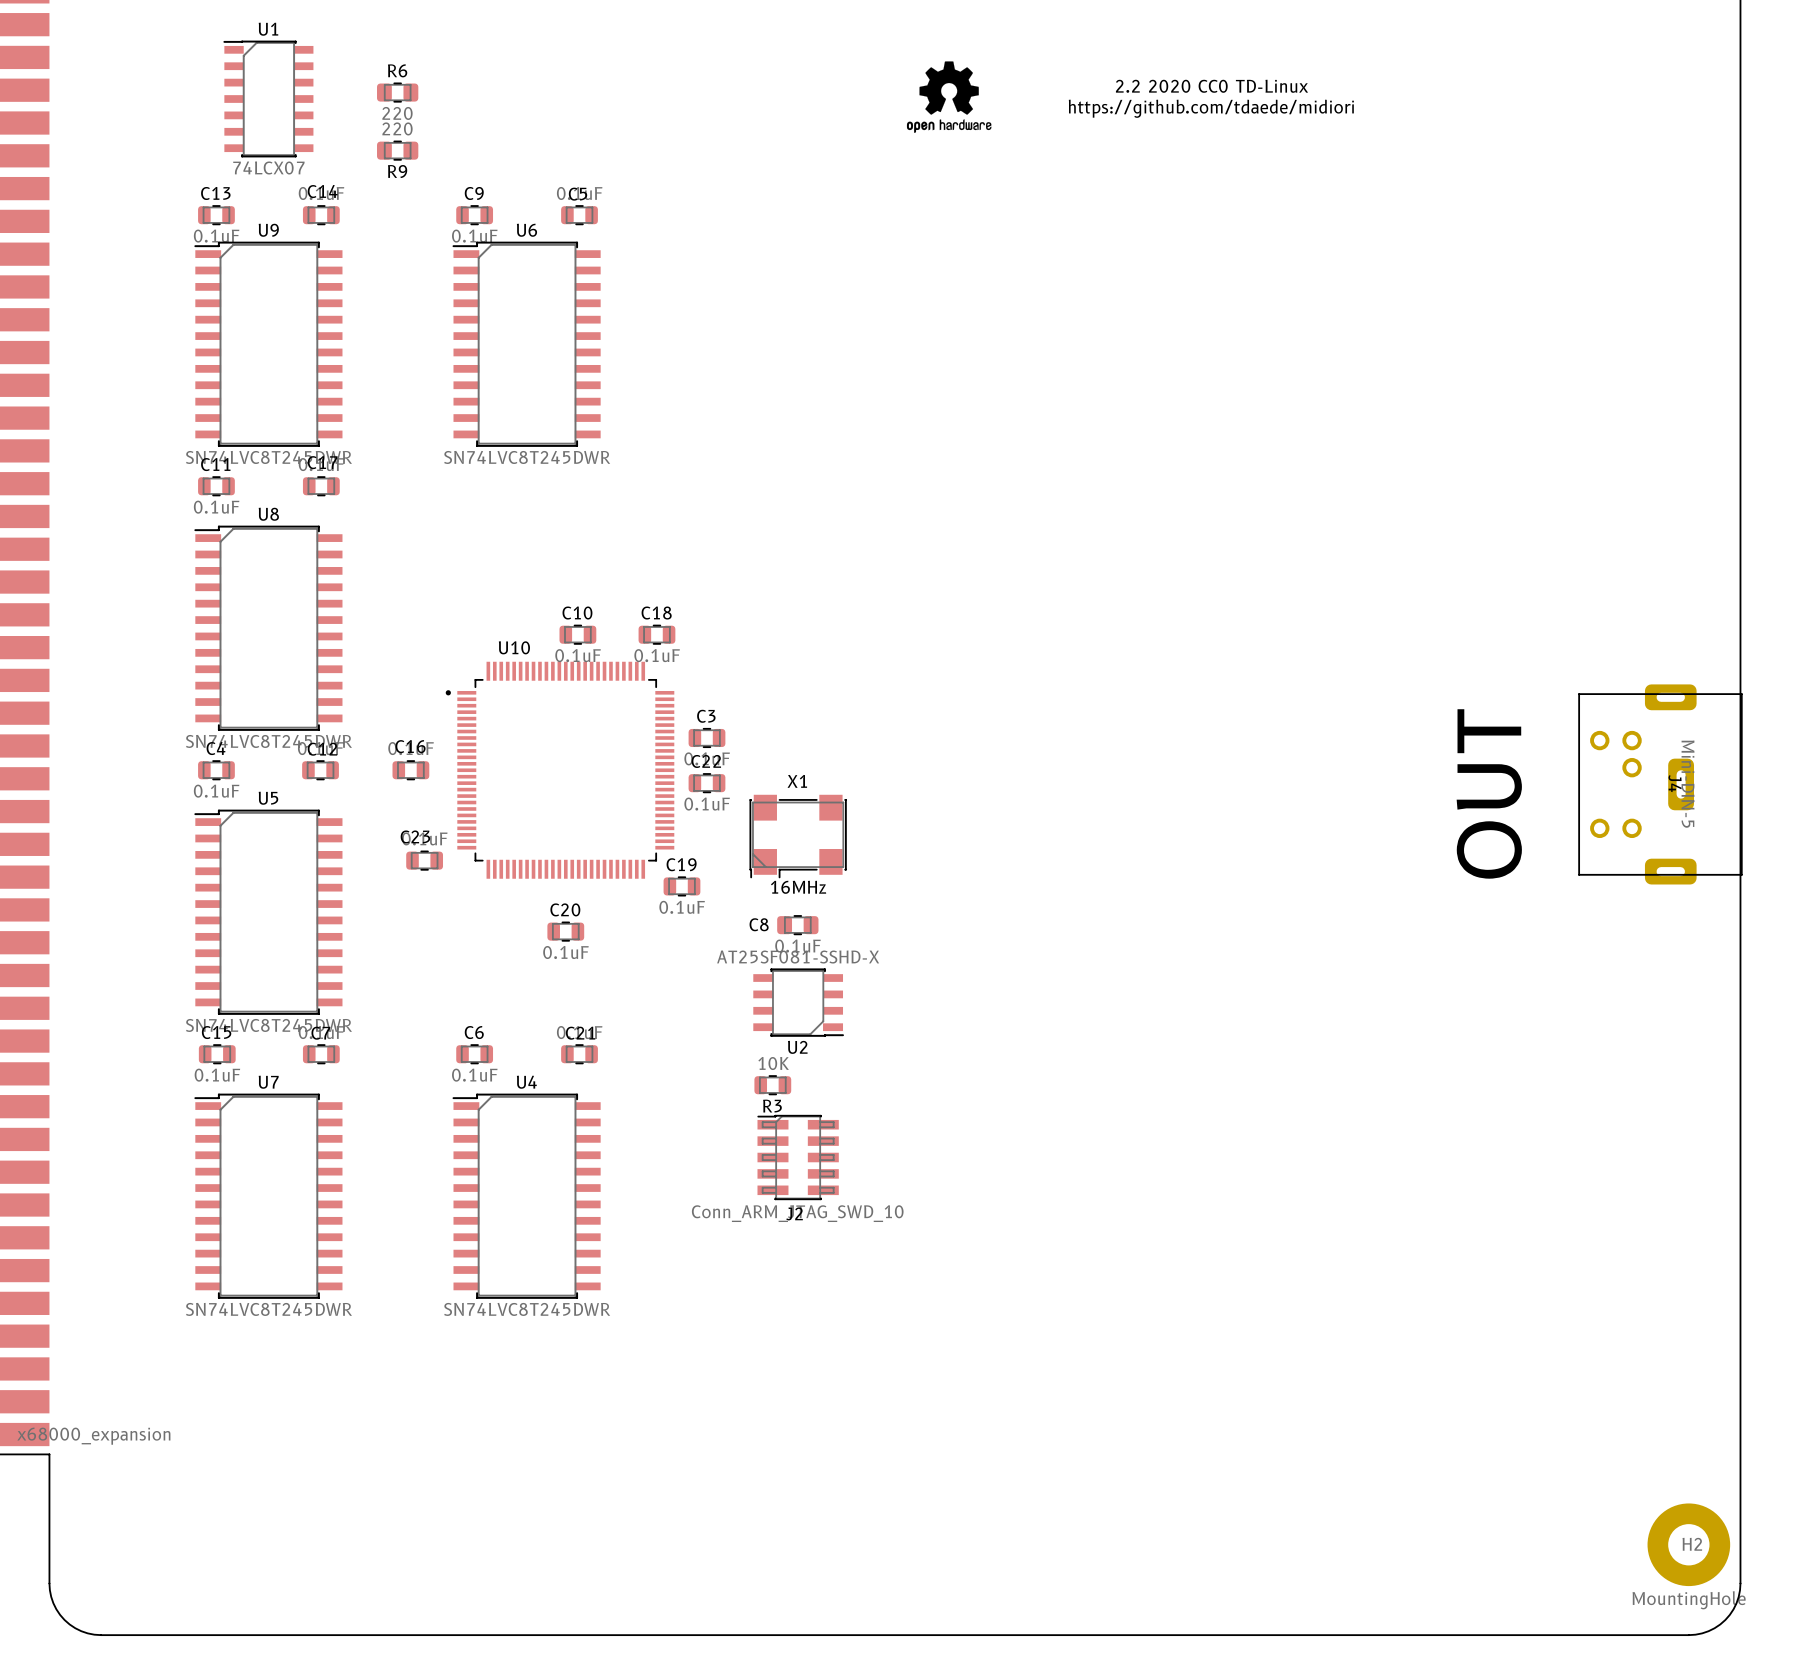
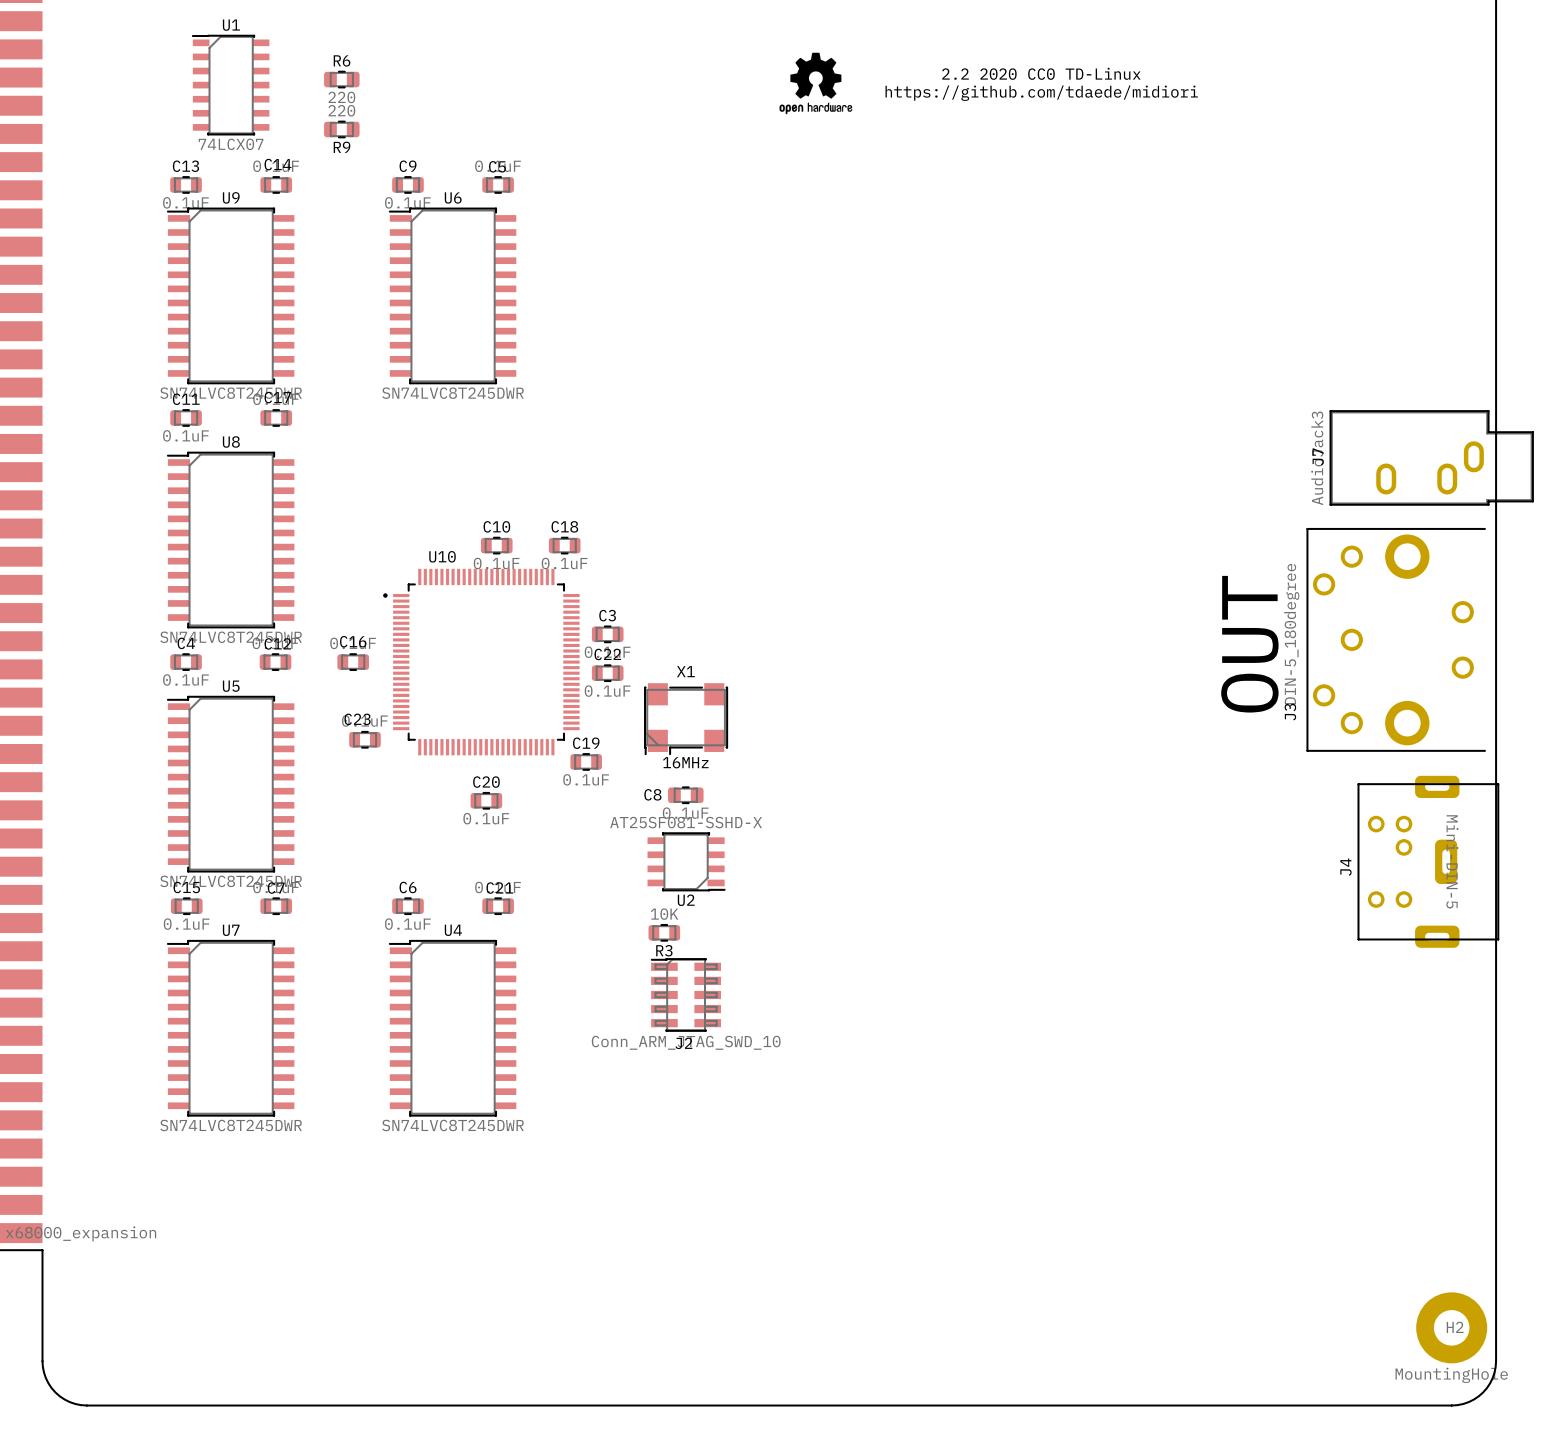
J7: none -> AudioJack3 (1431, 457)
J3: none -> DIN-5_180degree (1396, 639)
J4 name rotation: 0° (1675, 783) -> 180° (1345, 867)
J4 name position: J4 (1675, 783) -> J4 (1345, 867)
J4 position: (1660, 784) -> (1428, 861)
text position: OUT (1489, 793) -> OUT (1249, 644)

